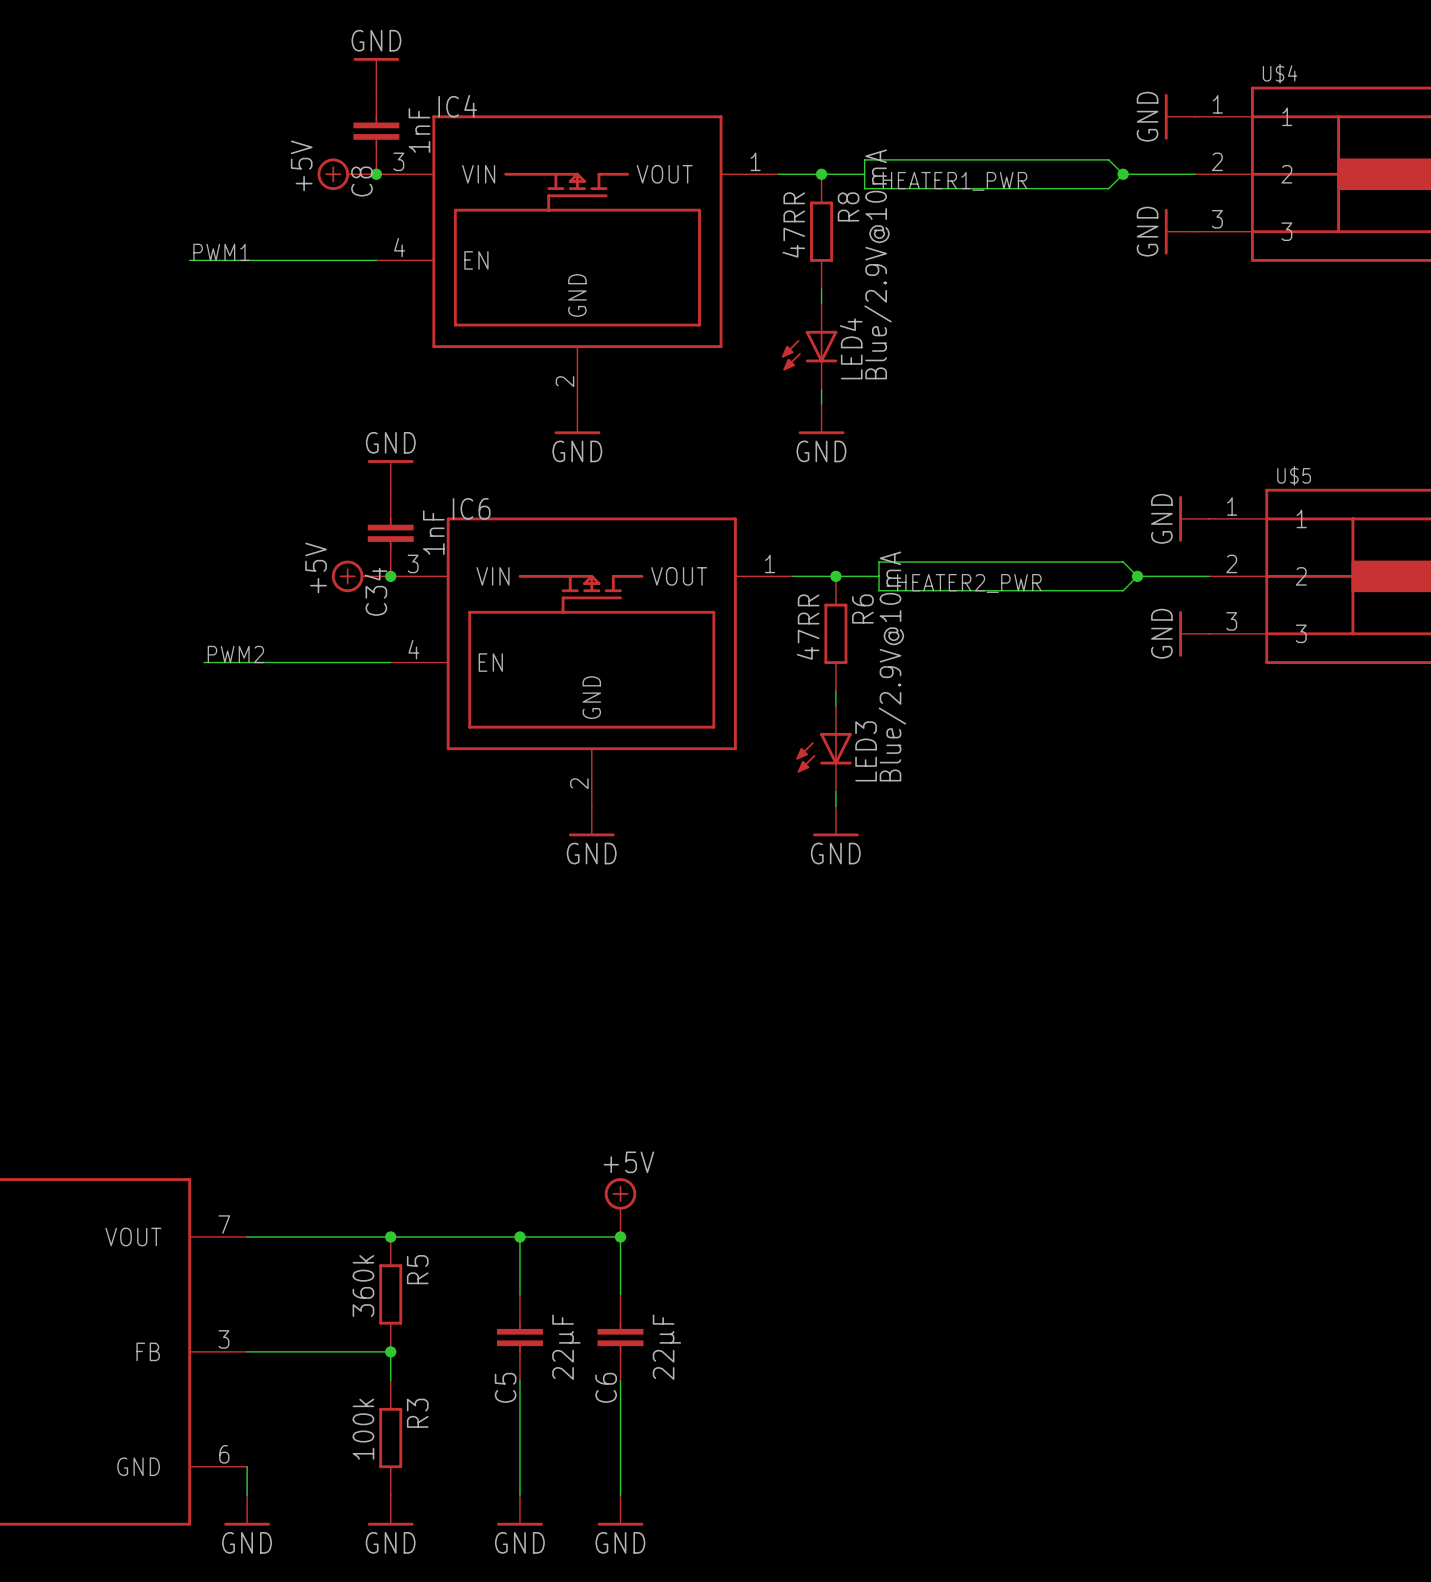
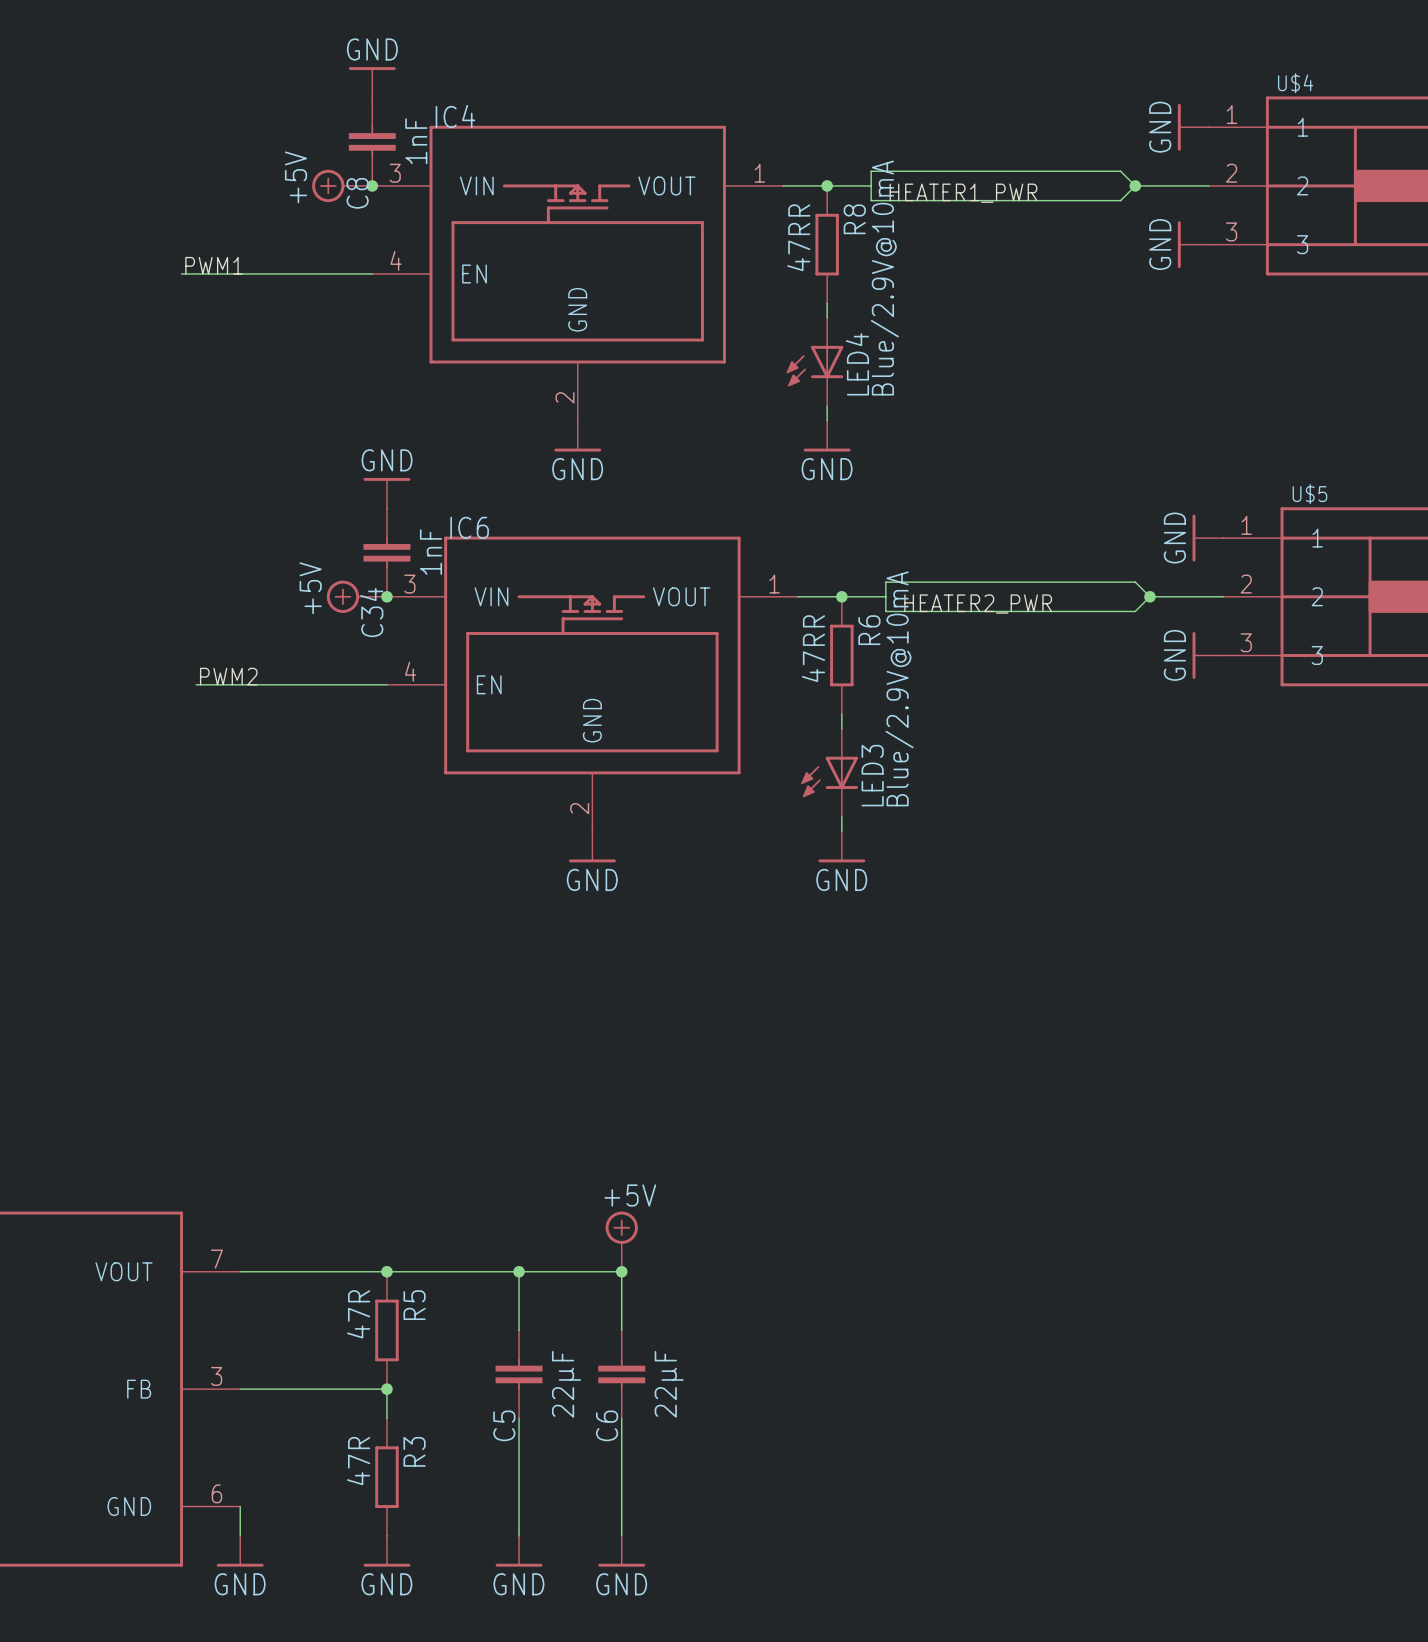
R5 value: 360k (363, 1286) -> 47R (358, 1314)
R3 value: 100k (363, 1429) -> 47R (358, 1461)

